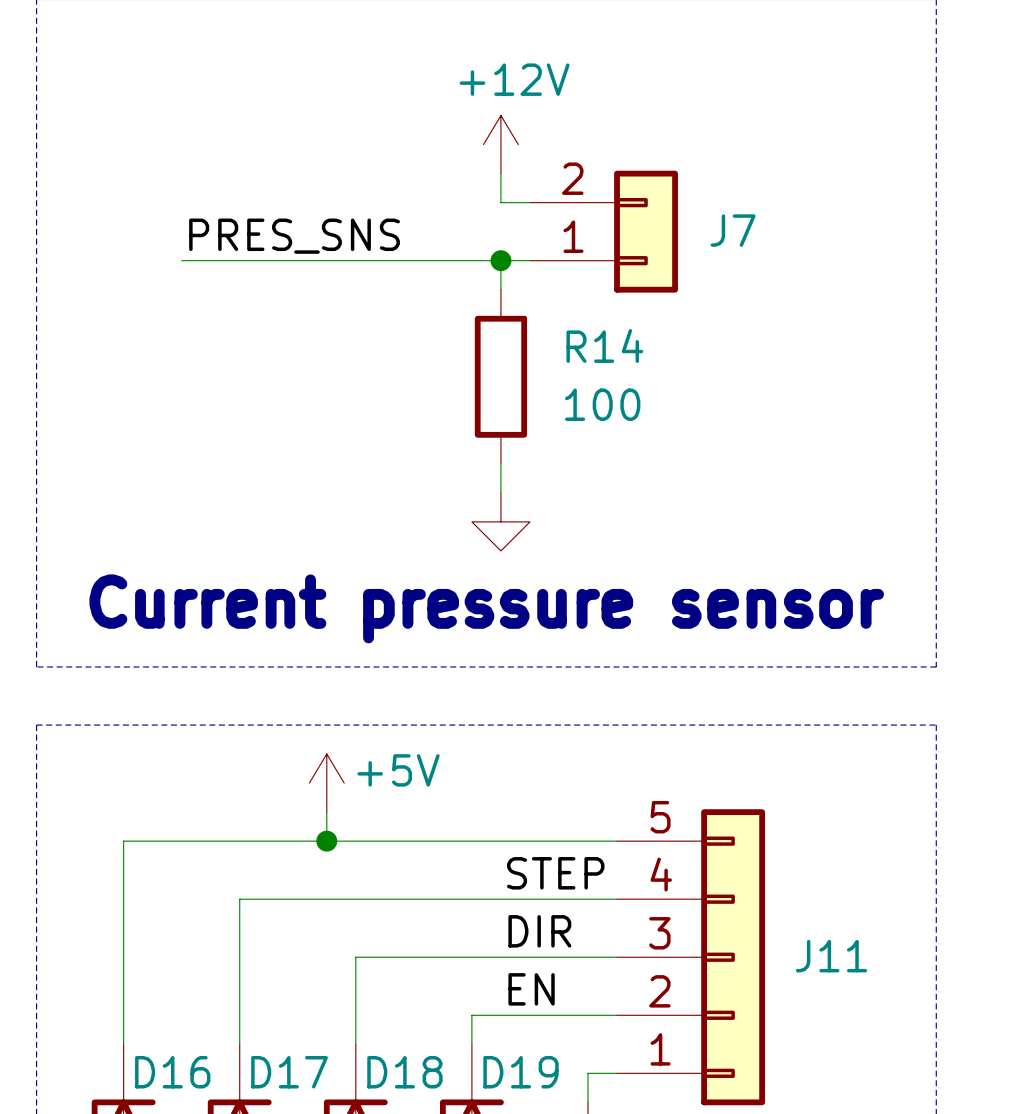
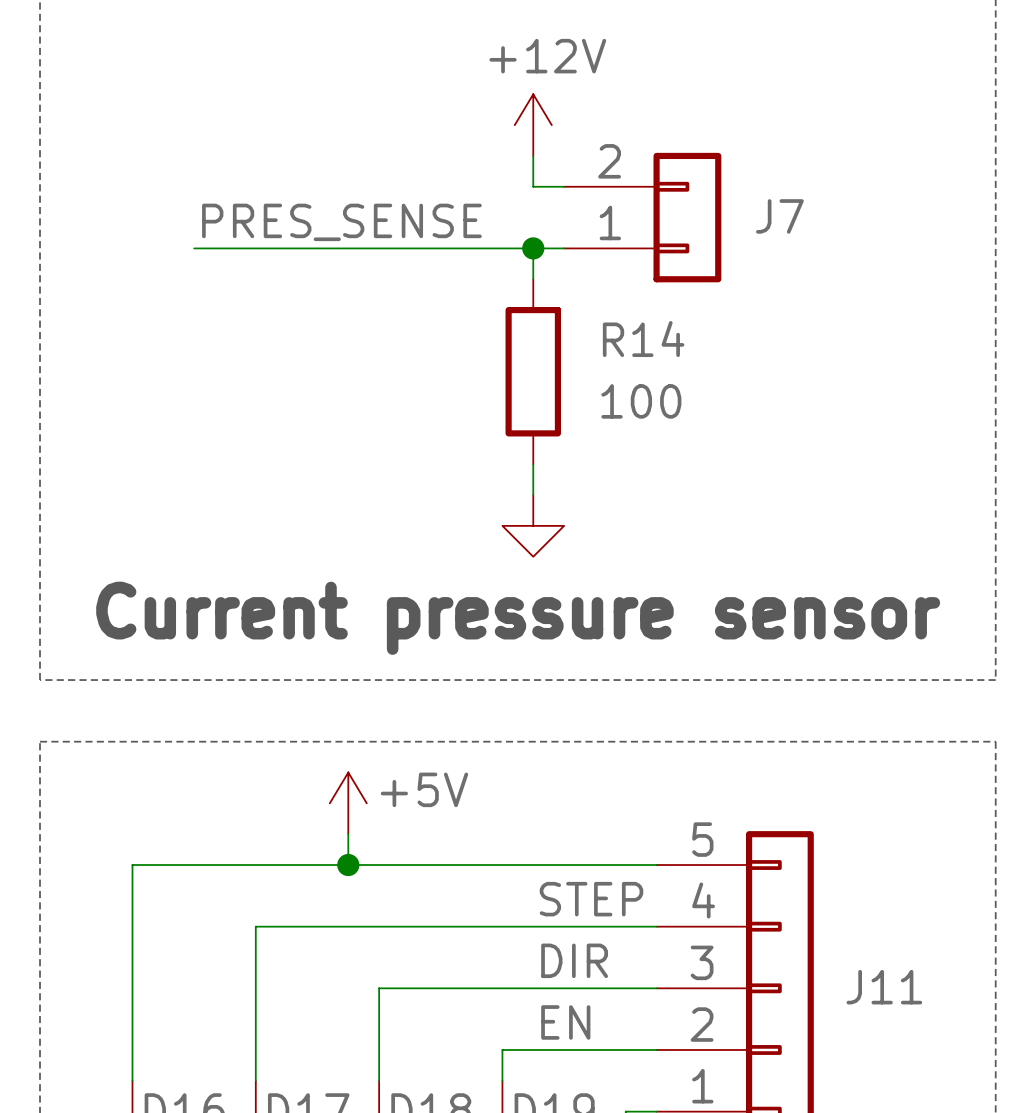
label: PRES_SNS (294, 236) -> PRES_SENSE (341, 222)

